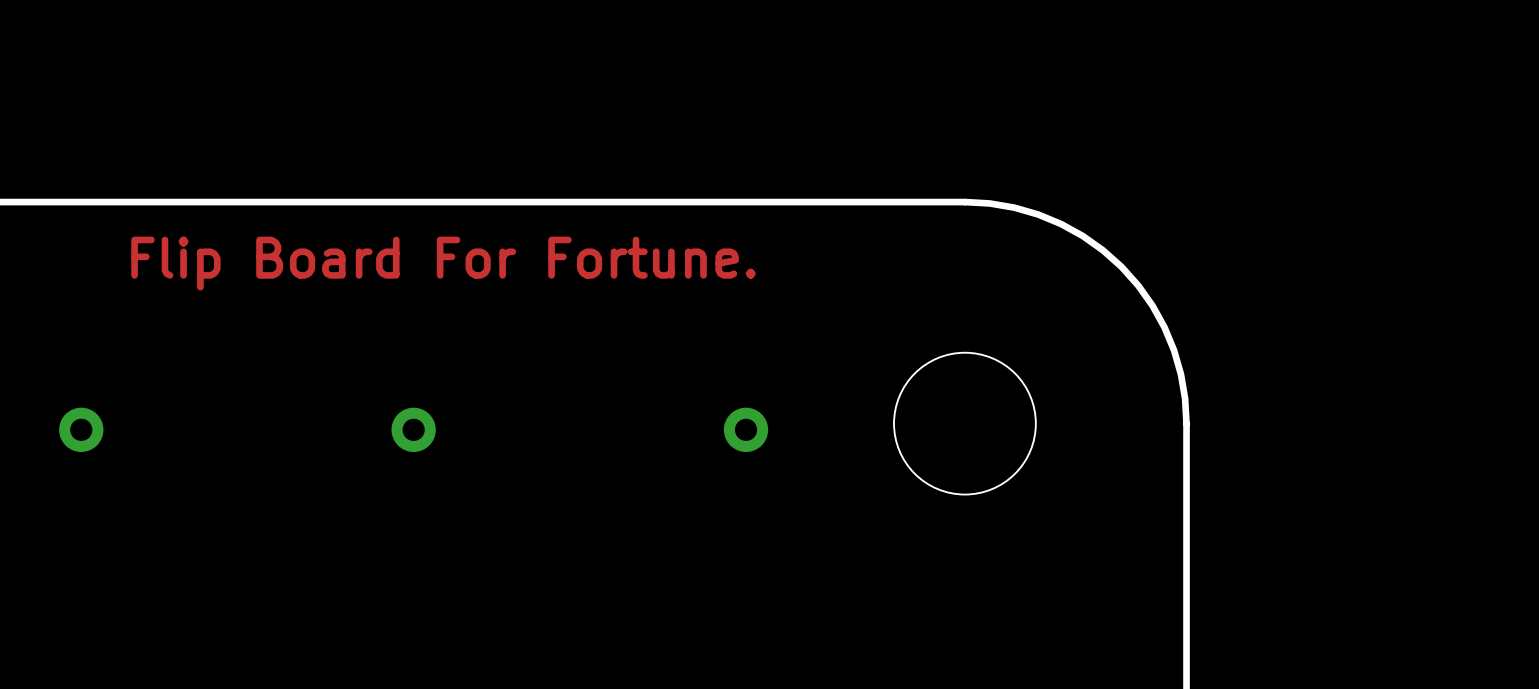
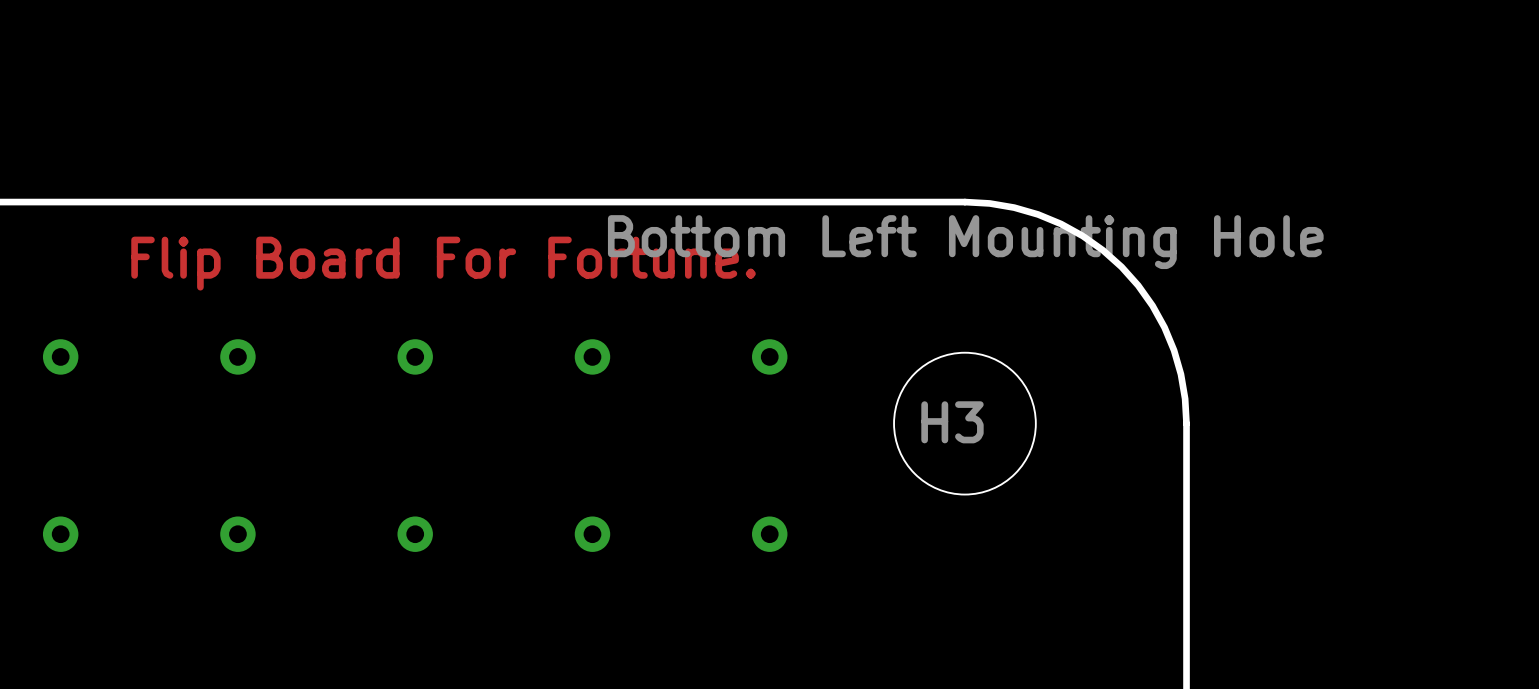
H3 value: none -> Bottom Left Mounting Hole (965, 242)
via: none -> (60, 356)
via: none -> (237, 356)
via: none -> (415, 356)
via: none -> (592, 356)
via: none -> (769, 356)
H3 name: none -> H3 (952, 422)
via: (81, 429) -> none
via: (413, 429) -> none
via: (746, 429) -> none
via: none -> (60, 534)
via: none -> (237, 534)
via: none -> (415, 534)
via: none -> (592, 534)
via: none -> (769, 534)

